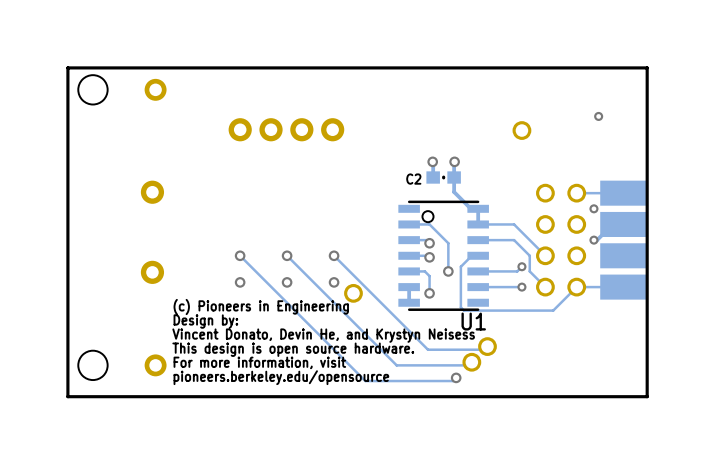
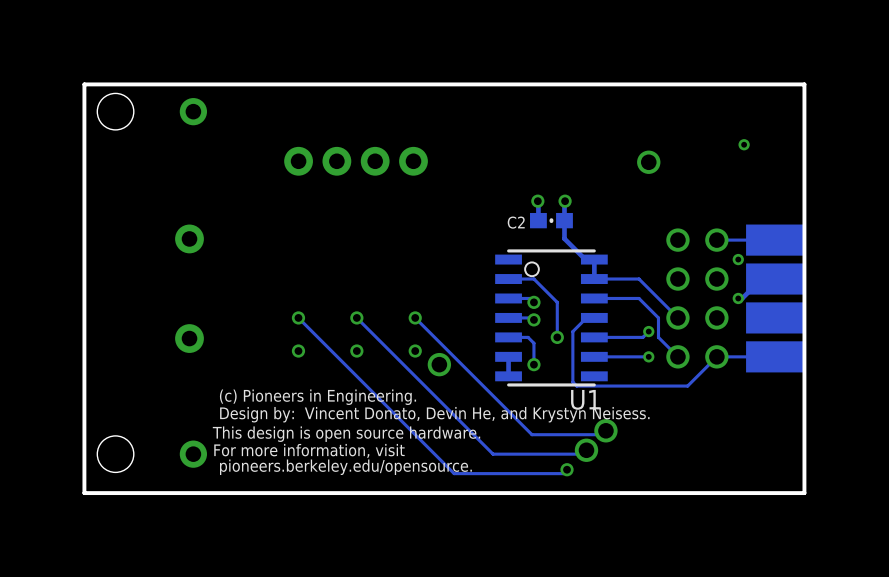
text: (c) Pioneers in Engineering (261, 307) -> none
text: Design by: (205, 321) -> (c) Pioneers in Engineering. (318, 397)
text: Vincent Donato, Devin He, and Krystyn Neisess (323, 335) -> Design by: Vincent Donato, Devin He, and Krystyn Neisess. (434, 414)
text: pioneers.berkeley.edu/opensource (281, 377) -> pioneers.berkeley.edu/opensource. (345, 467)

